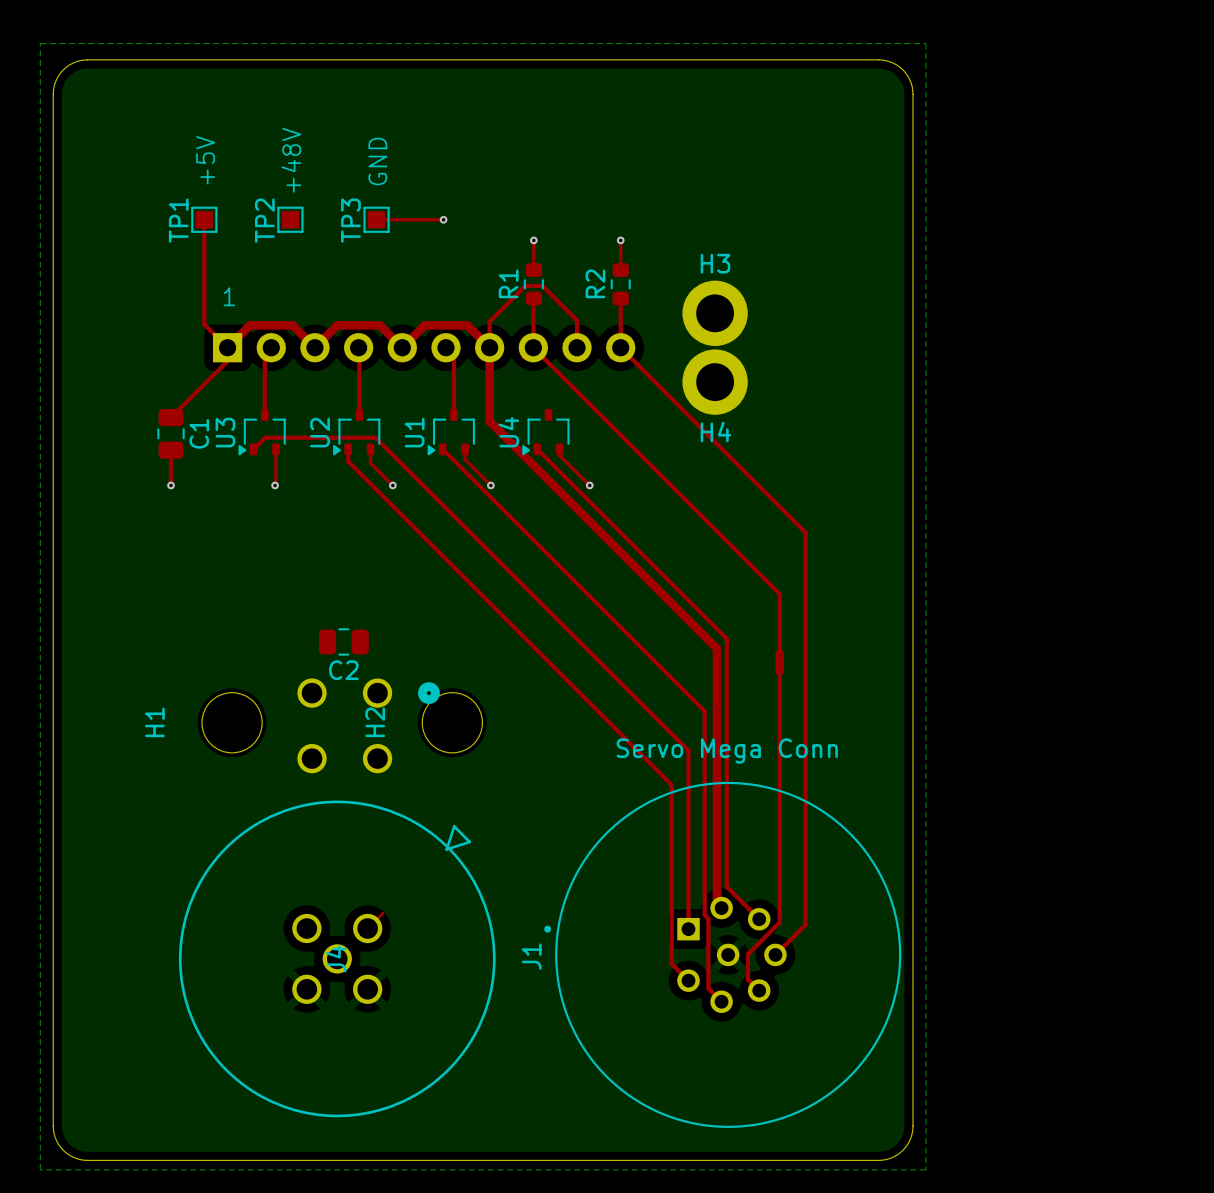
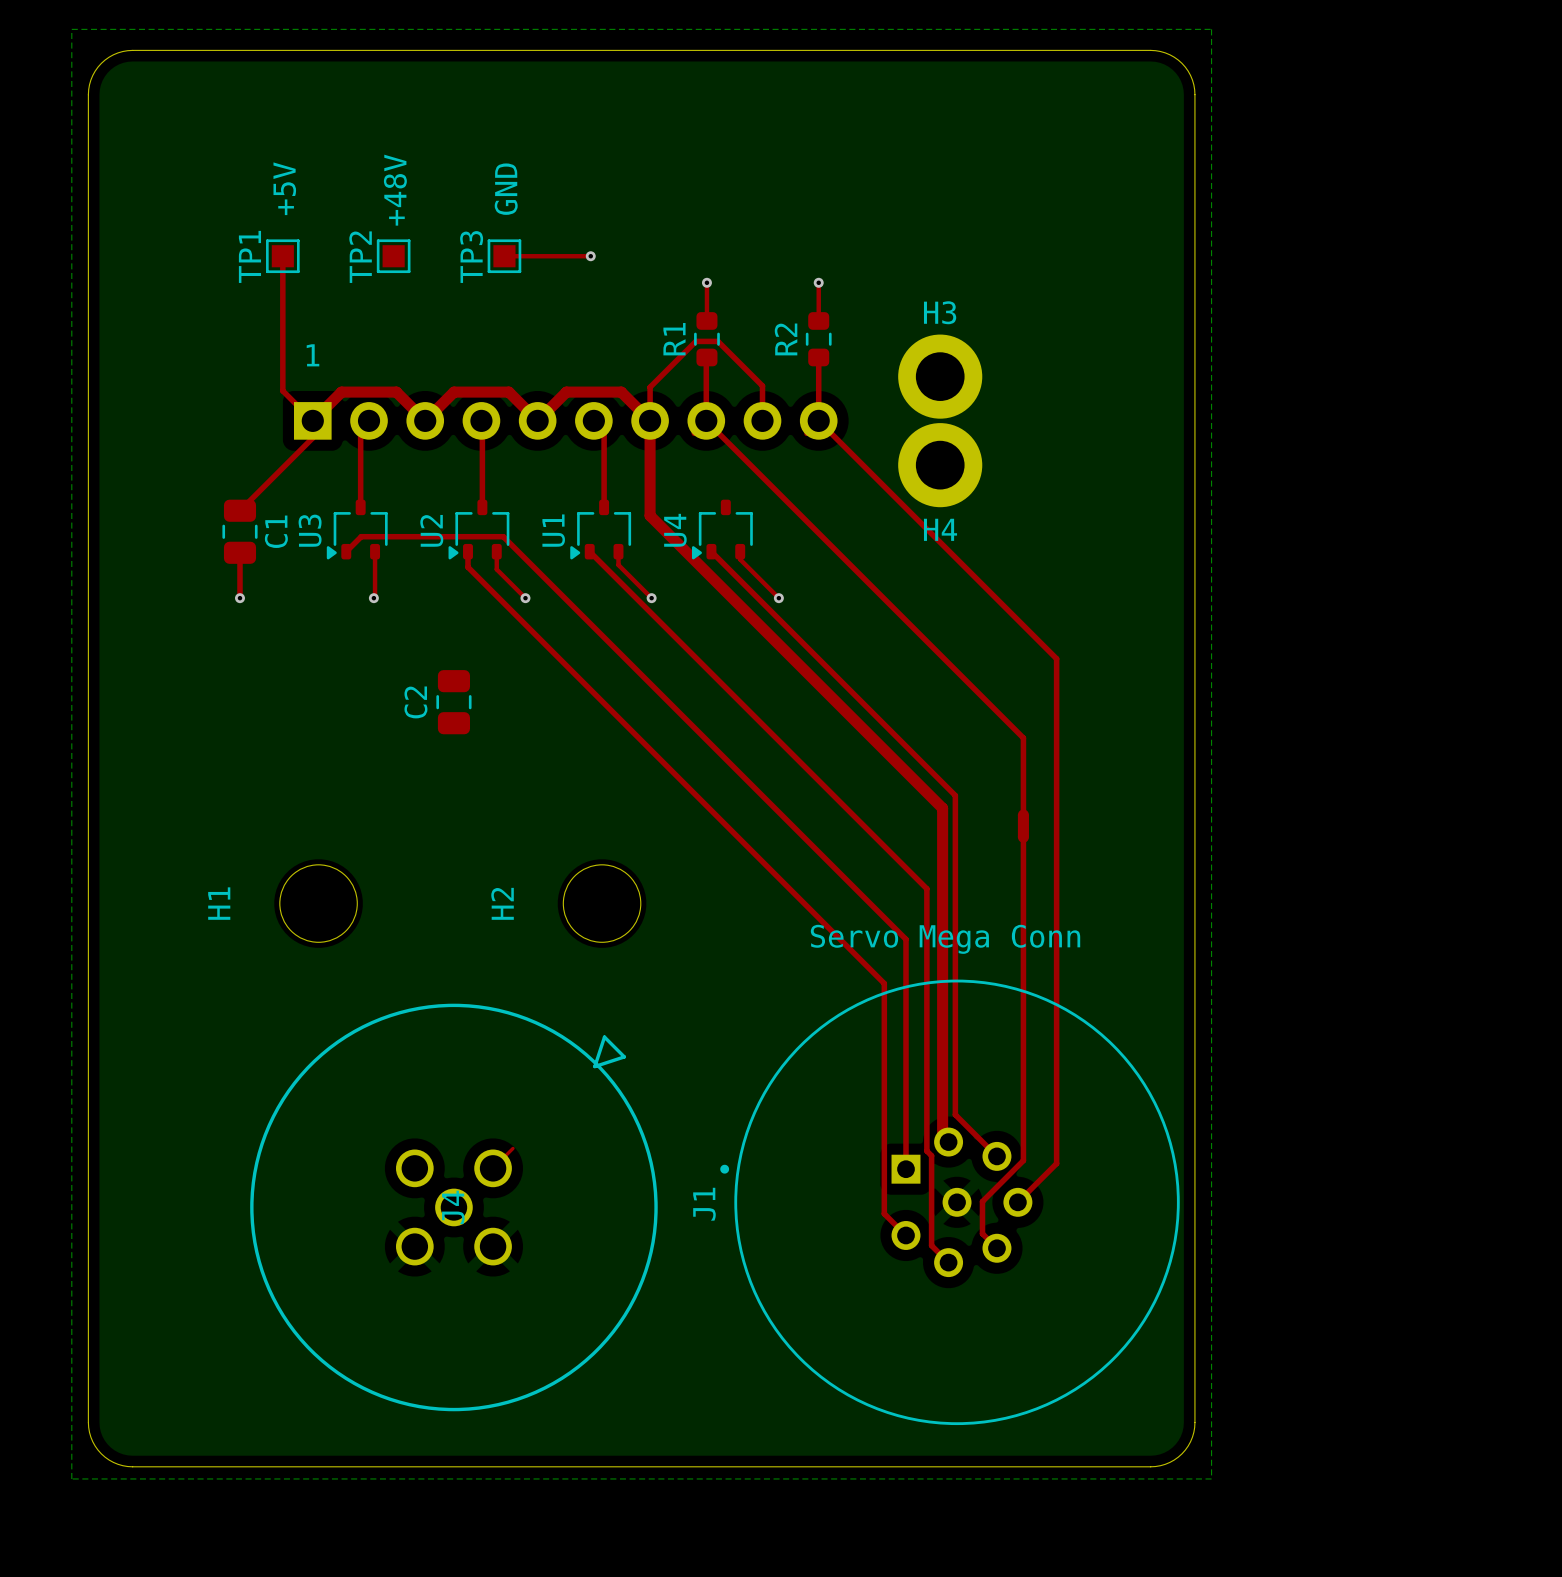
C2 rotation: 0° (343, 641) -> 90° clockwise (453, 702)
C2 position: (343, 641) -> (453, 702)
part: (368, 725) -> none

